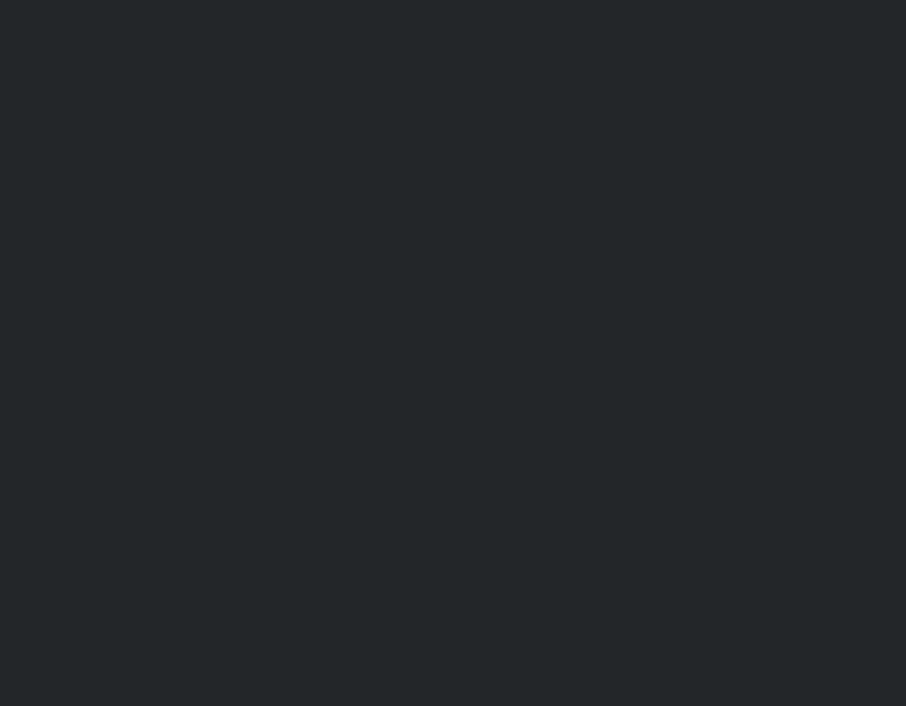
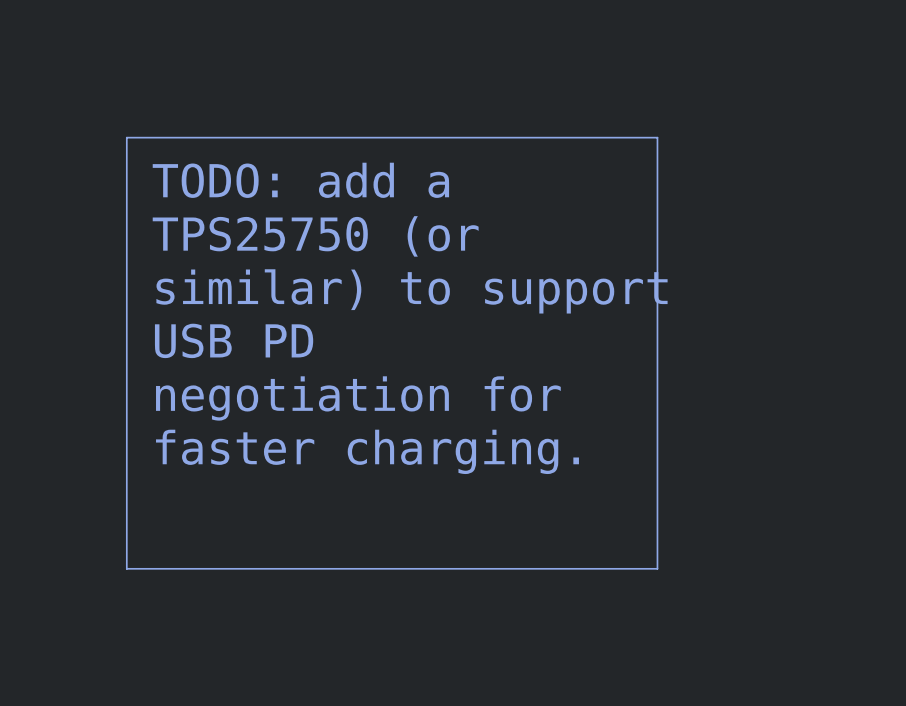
line: none -> (126, 137) (657, 137) (657, 568) (126, 568) (126, 137)
text: none -> TODO: add a (300, 180)
text: none -> TPS25750 (or (315, 236)
text: none -> similar) to support (412, 291)
text: none -> USB PD (234, 340)
text: none -> negotiation for (358, 398)
text: none -> faster charging. (367, 451)

